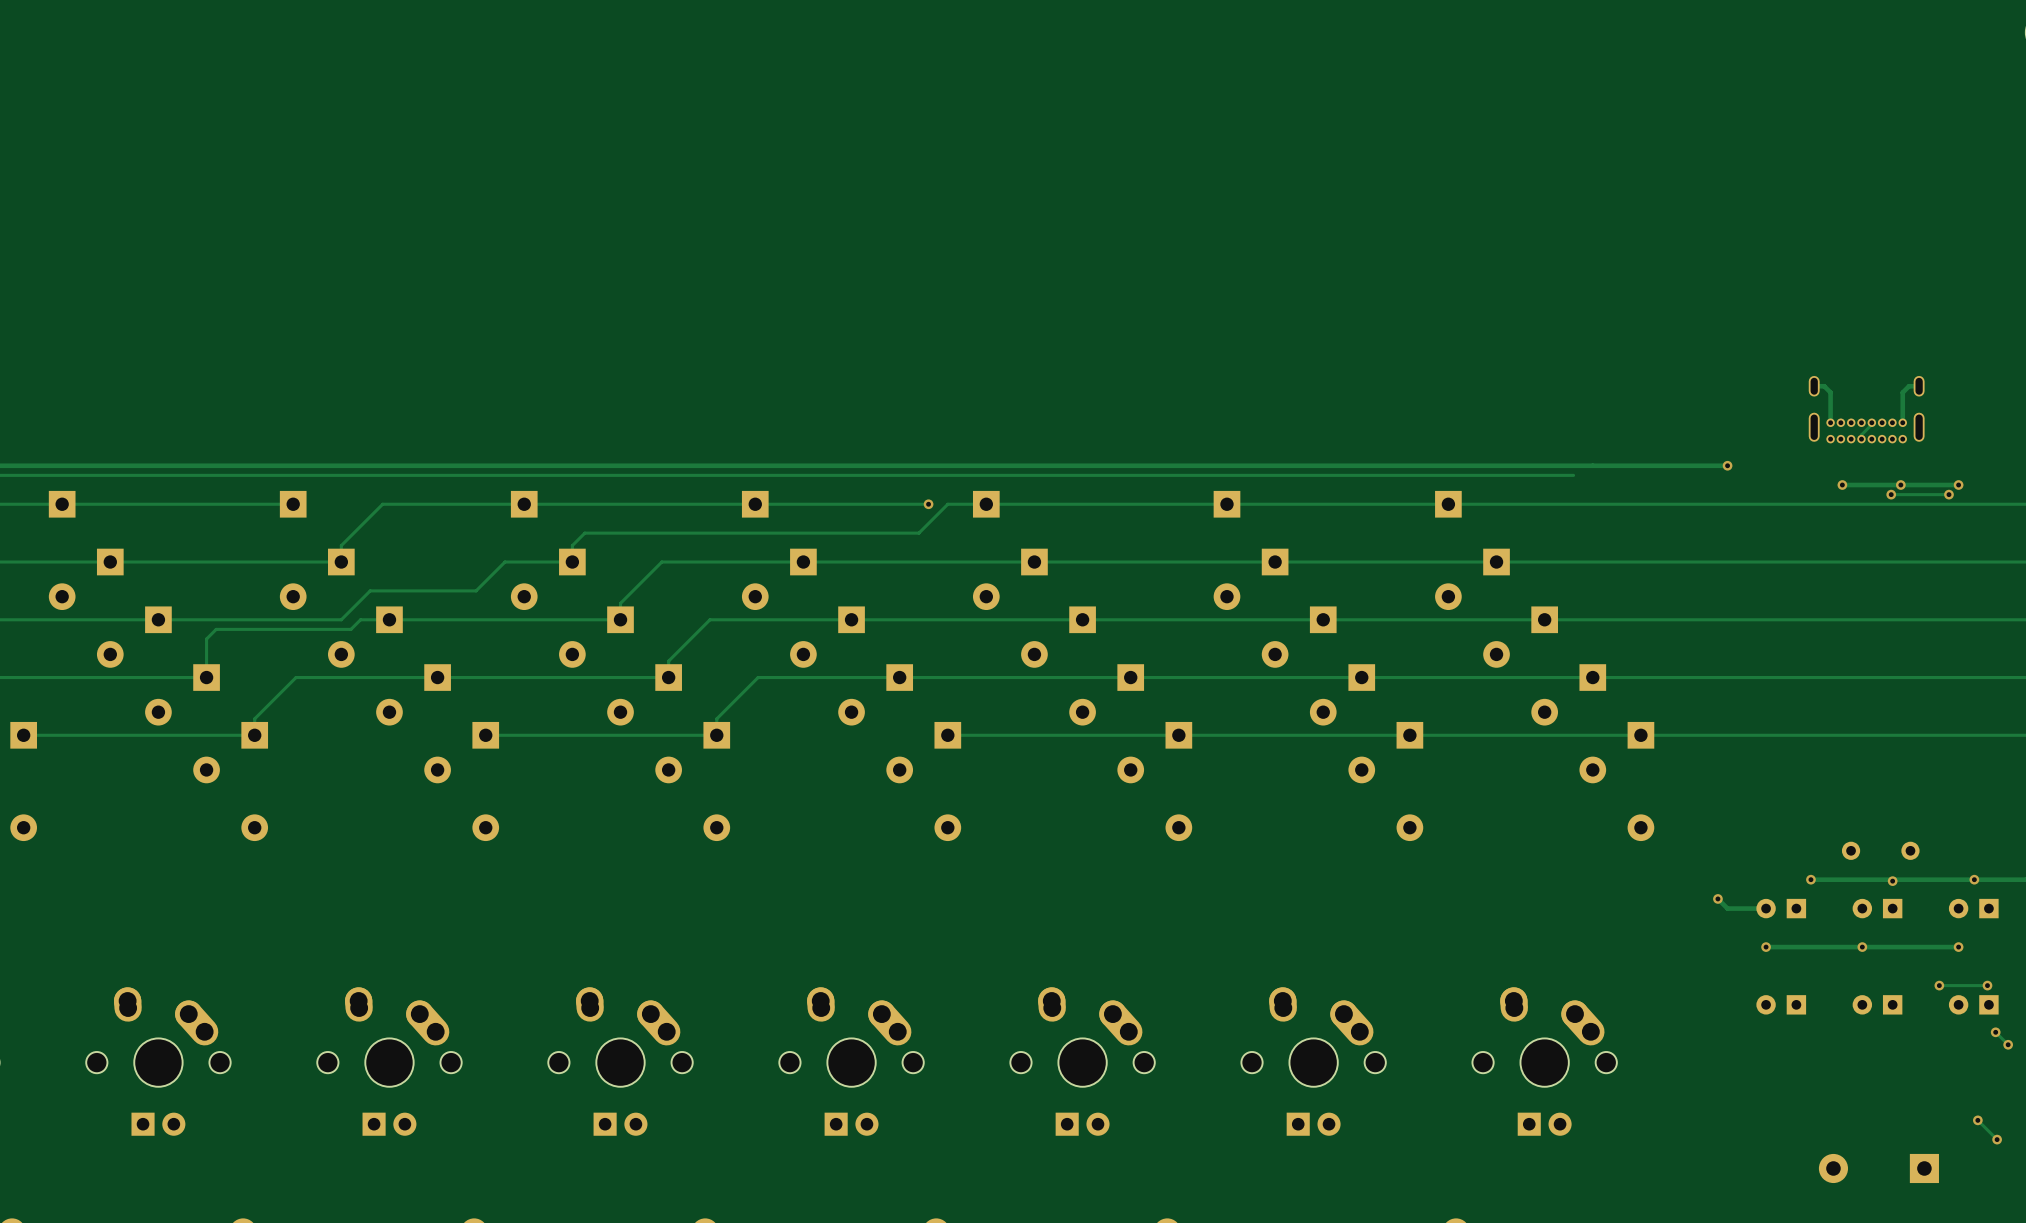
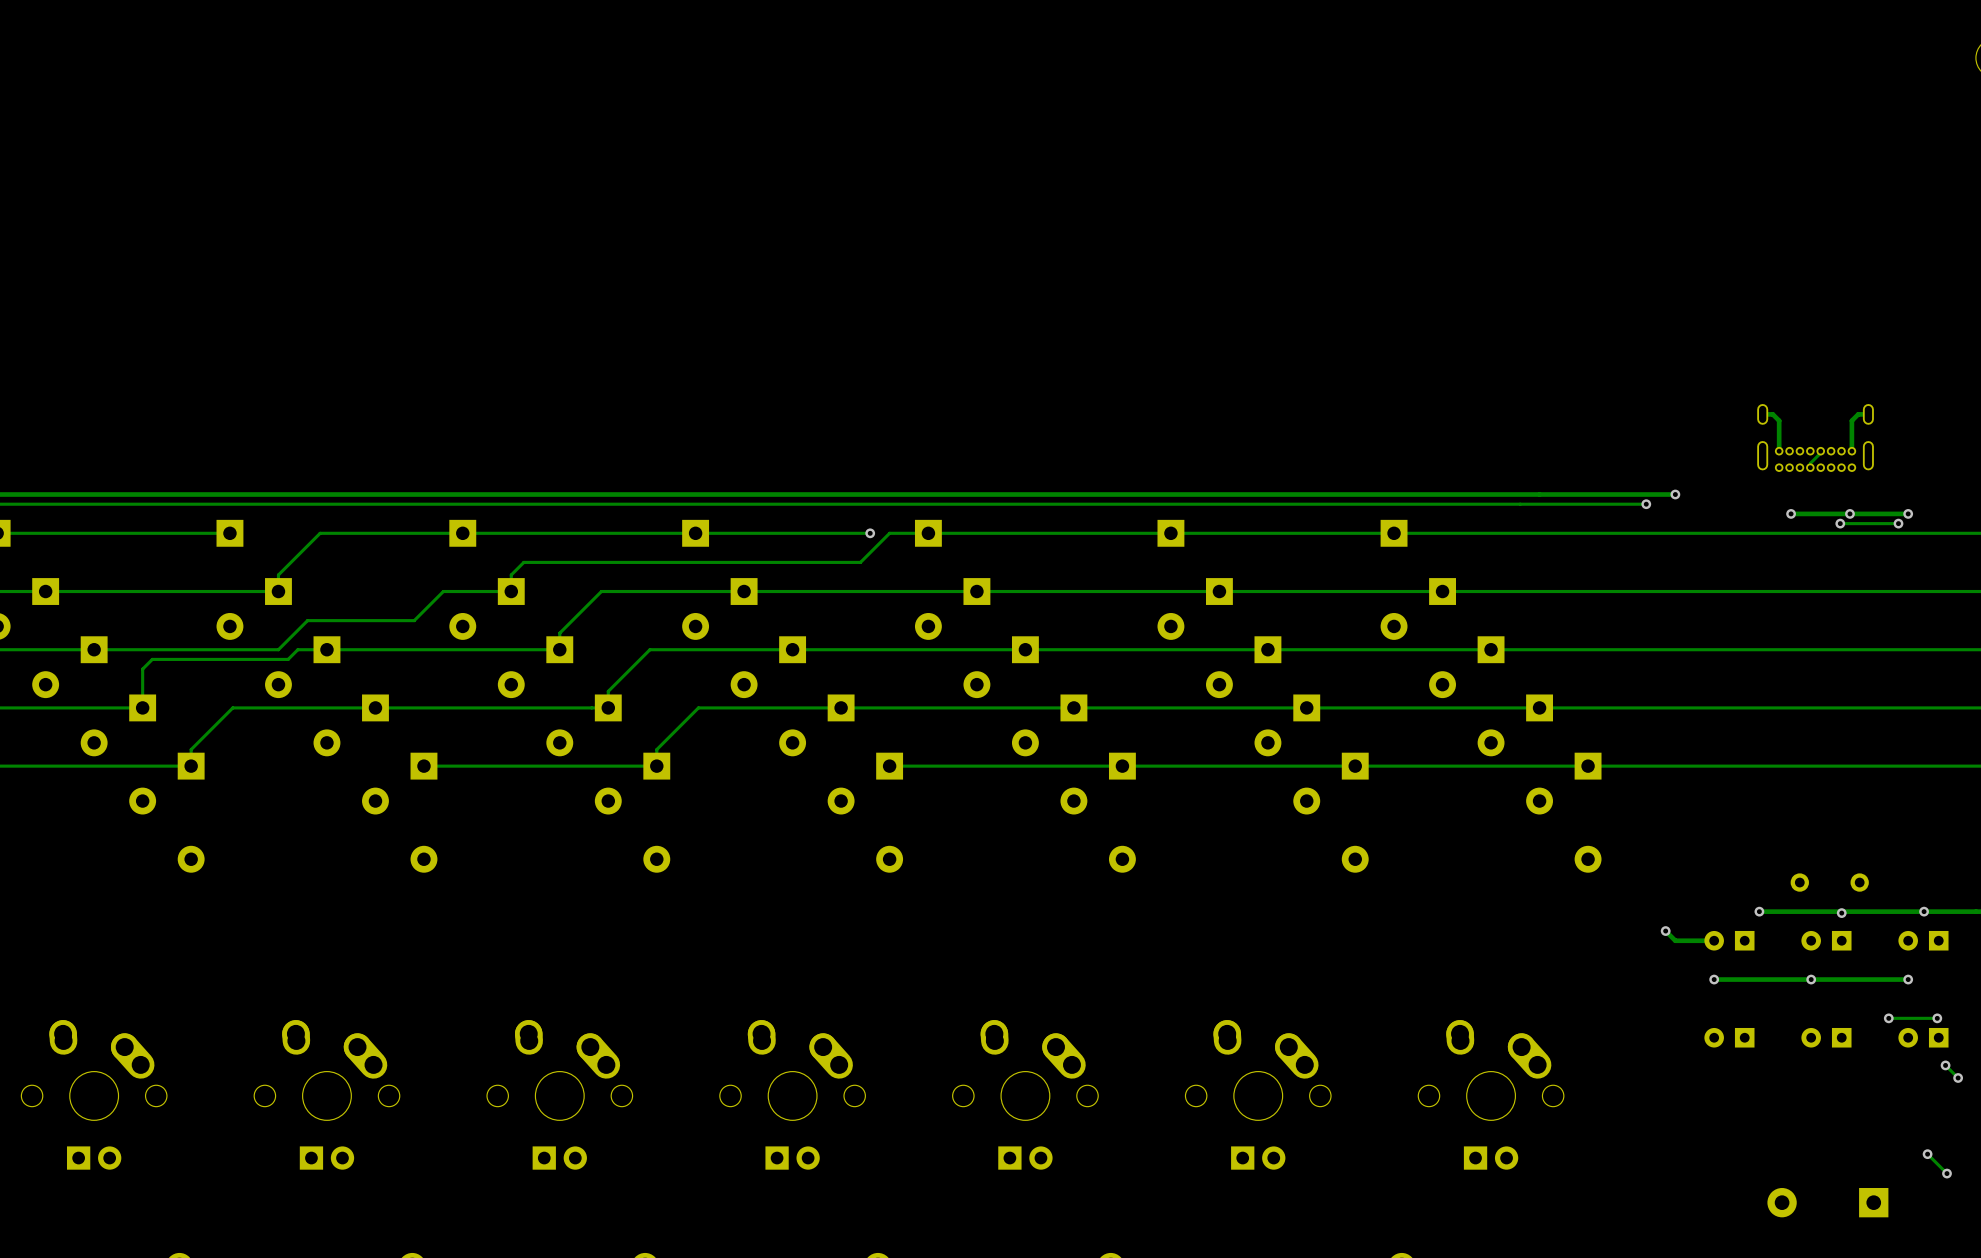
track: none -> (1646, 504) (1520, 504)
via: none -> (1646, 504)

